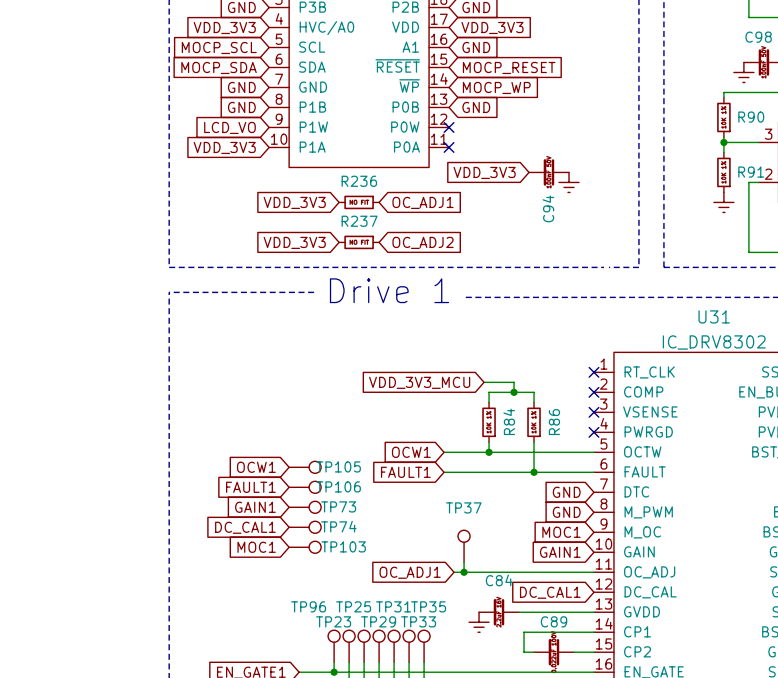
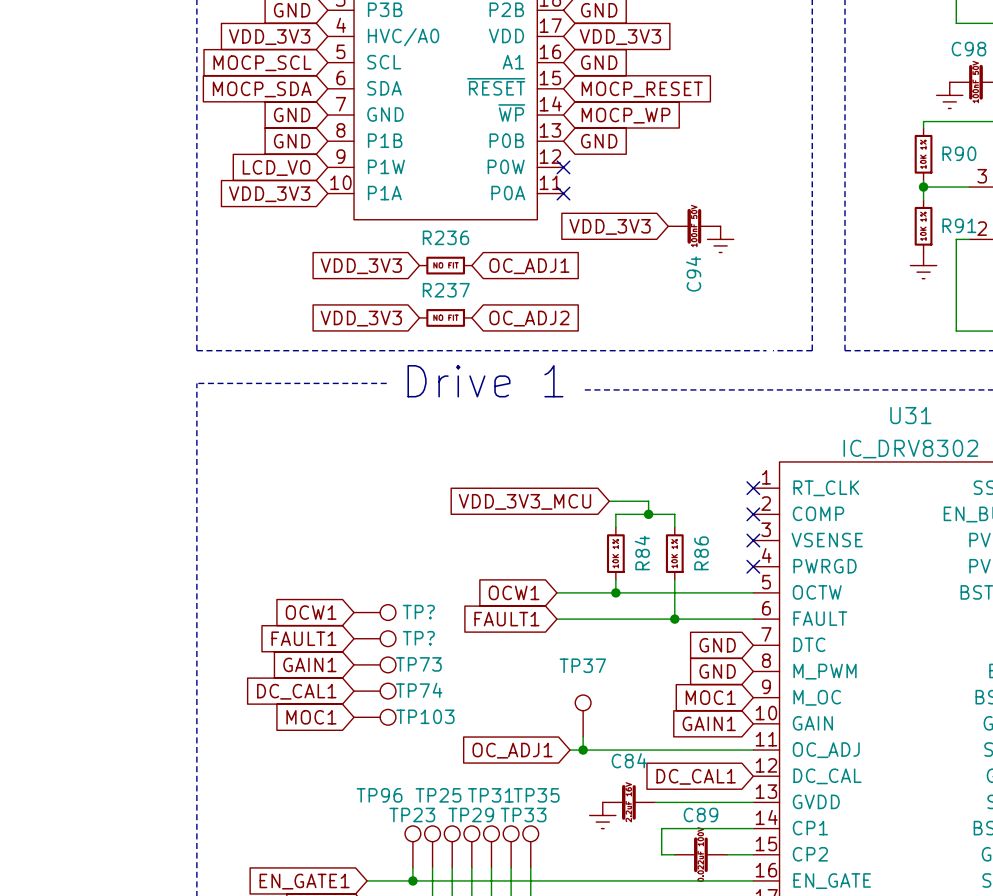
TP105 name: TP105 (338, 466) -> TP? (418, 612)
TP106 name: TP106 (338, 486) -> TP? (418, 638)

